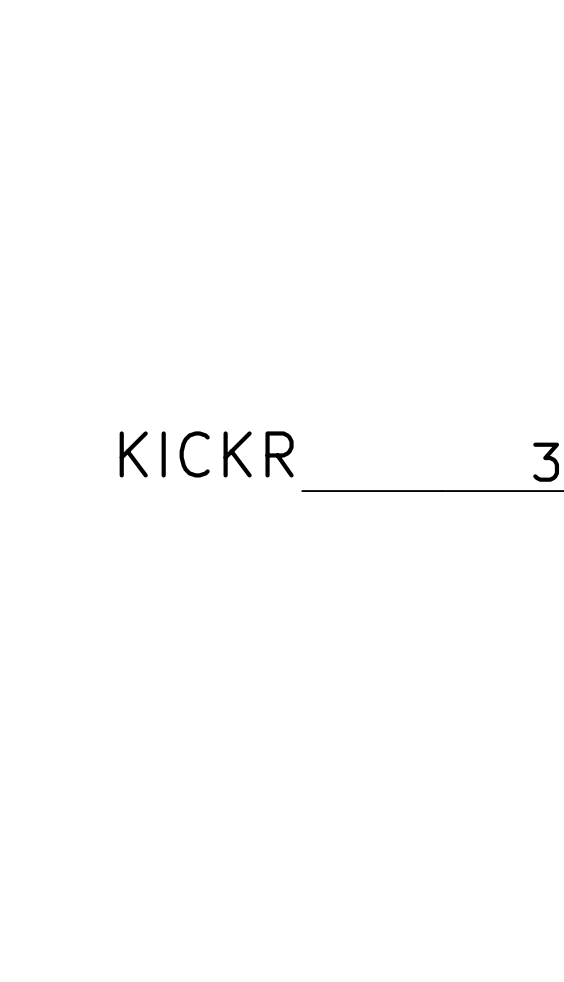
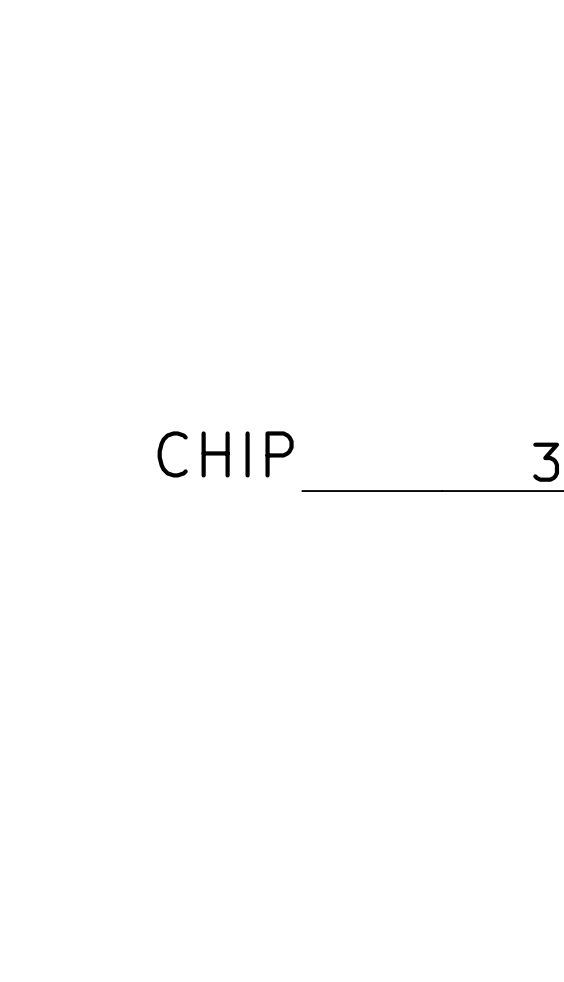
label: KICKR (206, 454) -> CHIP (225, 454)

